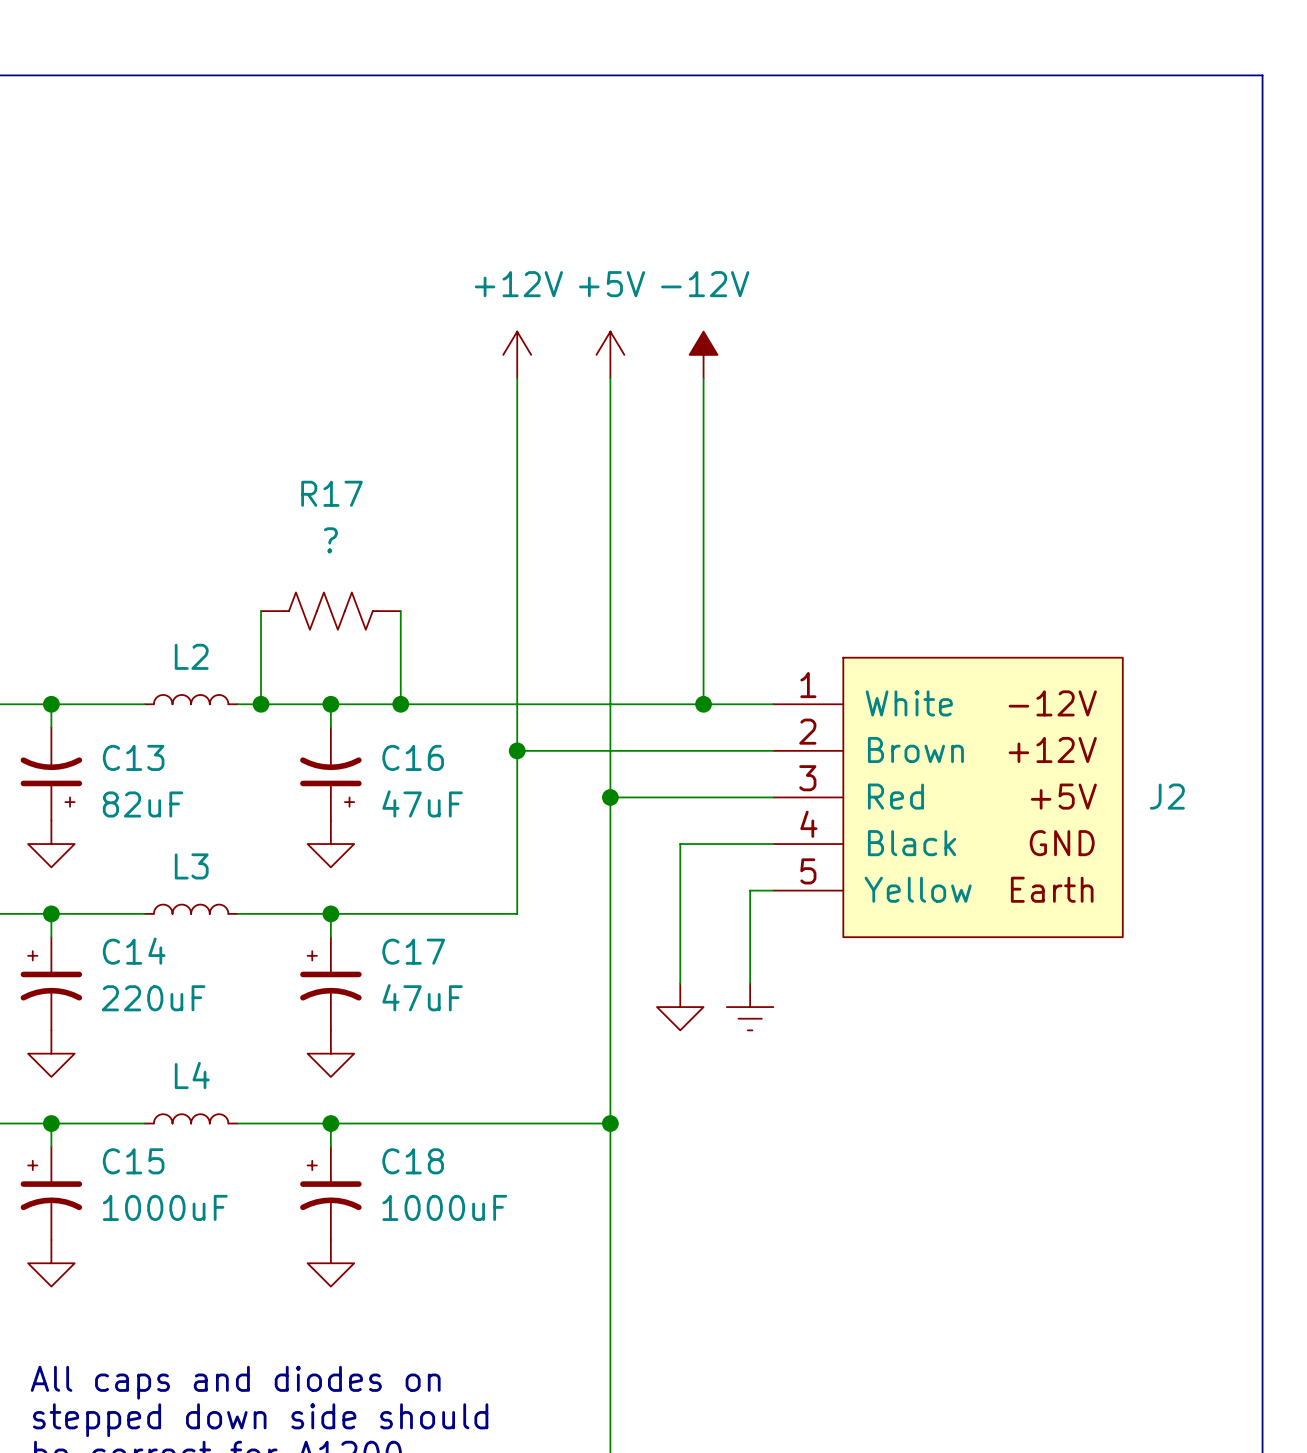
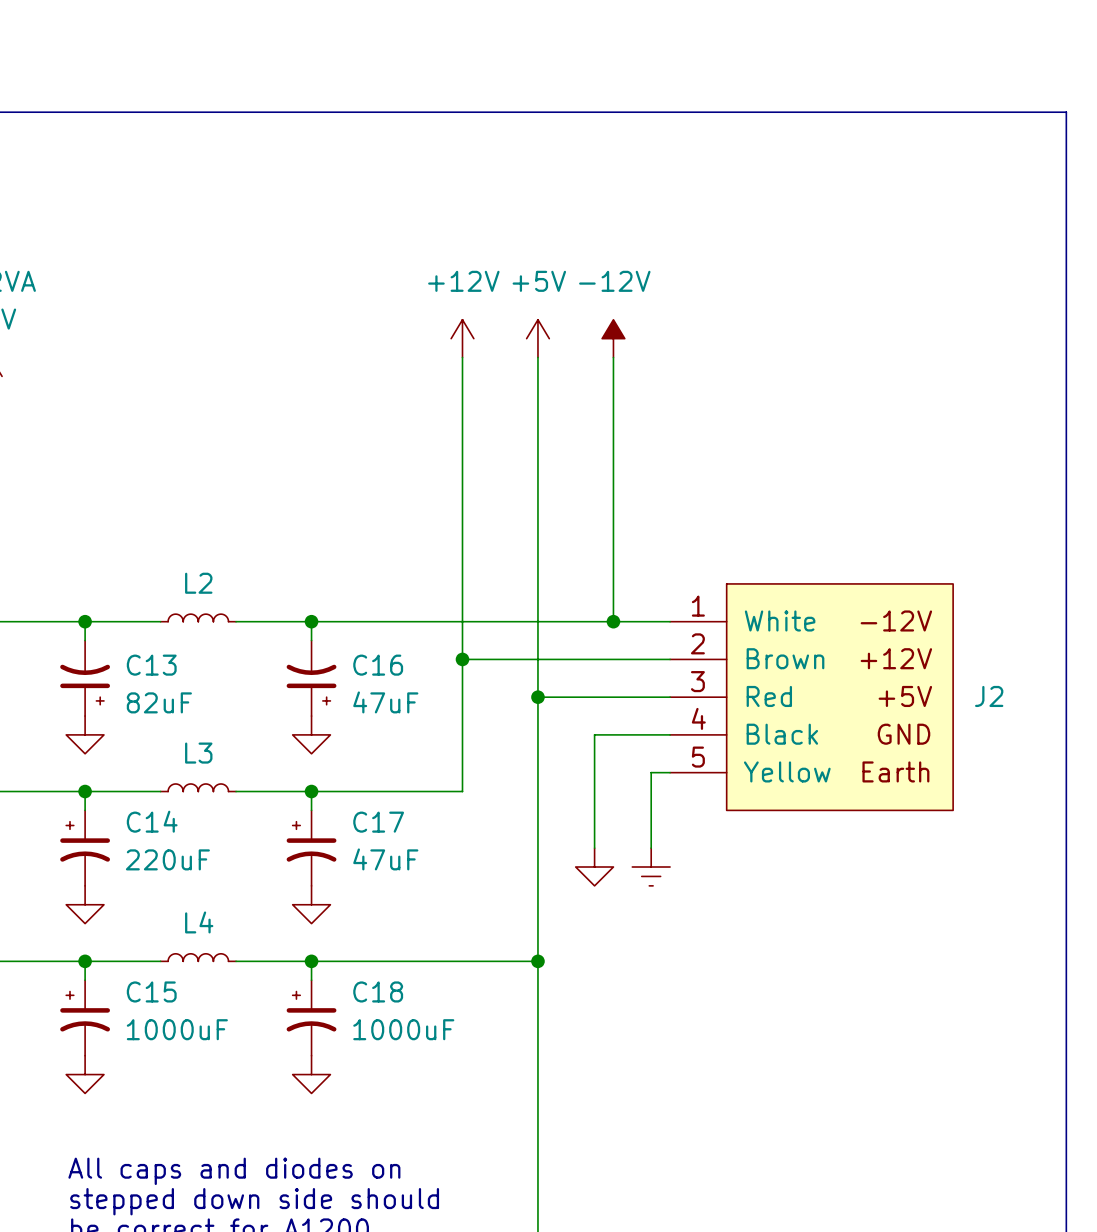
wire: (261, 611) (261, 704) -> none
R17: ? (330, 611) -> none
wire: (400, 611) (400, 704) -> none
junction: (261, 704) -> none
junction: (400, 704) -> none

